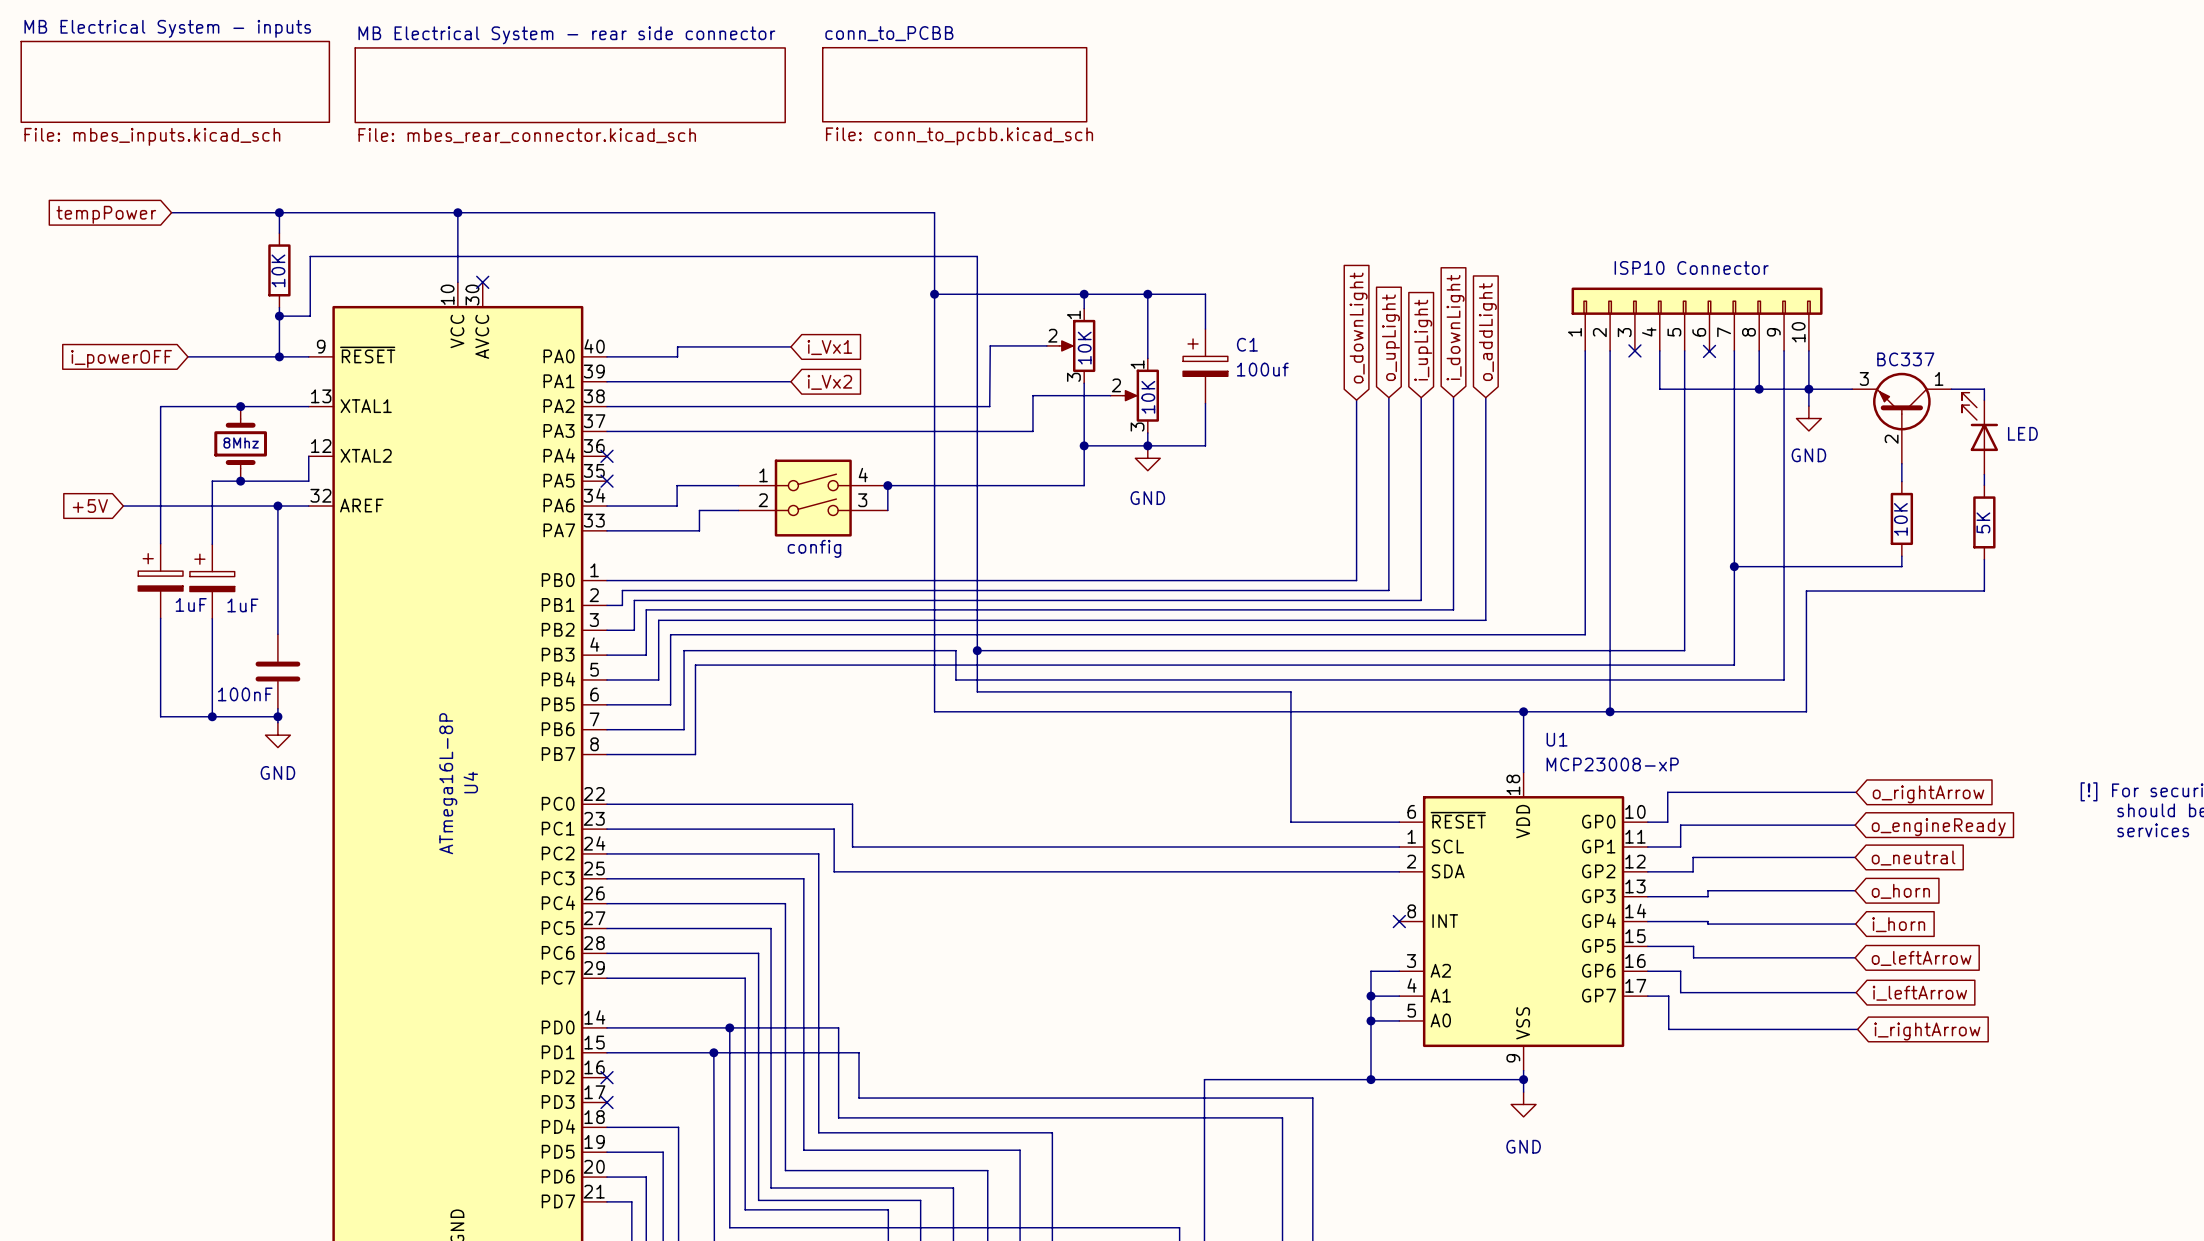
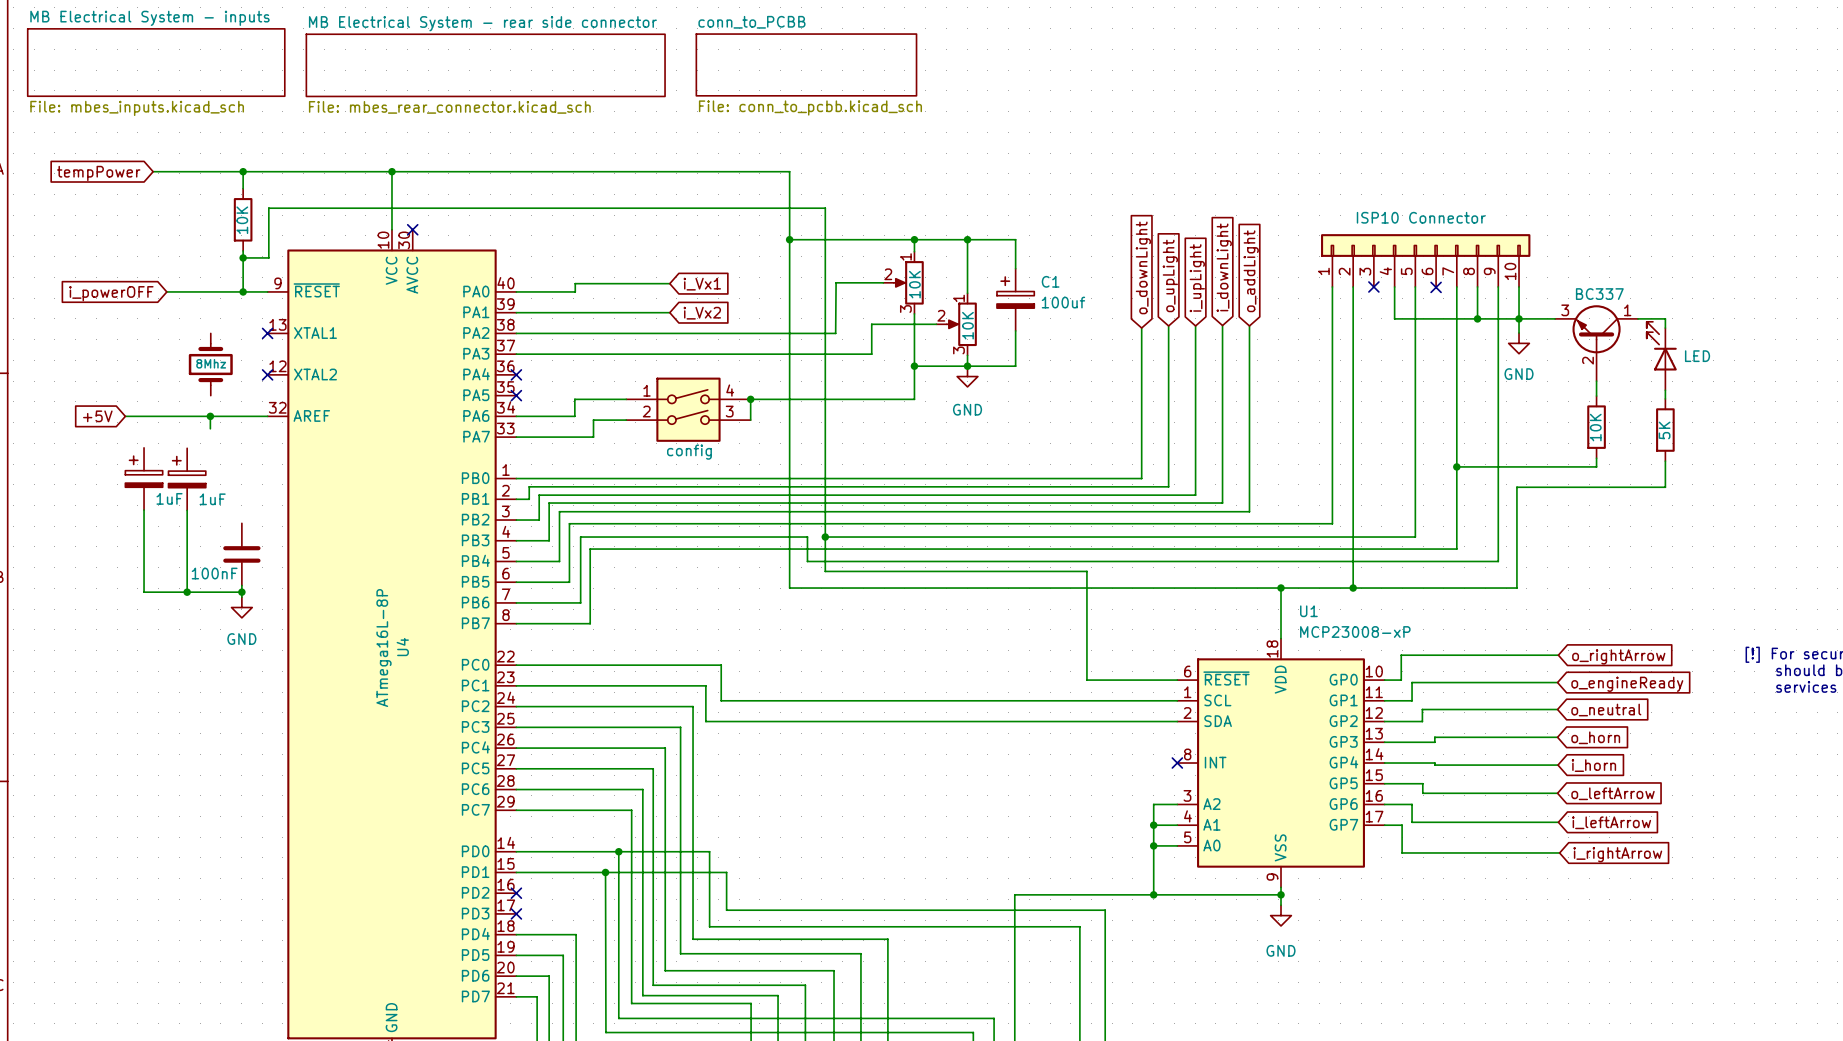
junction: (240, 406) -> none
wire: (308, 406) (160, 406) (160, 543) -> none
no-connect mark: none -> (267, 333)
wire: (308, 456) (308, 481) (212, 481) (212, 544) -> none
no-connect mark: none -> (267, 374)
junction: (240, 481) -> none
global label position: +5V (90, 506) -> +5V (97, 416)
wire: (123, 506) (138, 506) -> none
wire: none -> (210, 416) (210, 428)
junction: none -> (210, 416)
wire: (277, 506) (277, 634) -> none
junction: (277, 506) -> none

